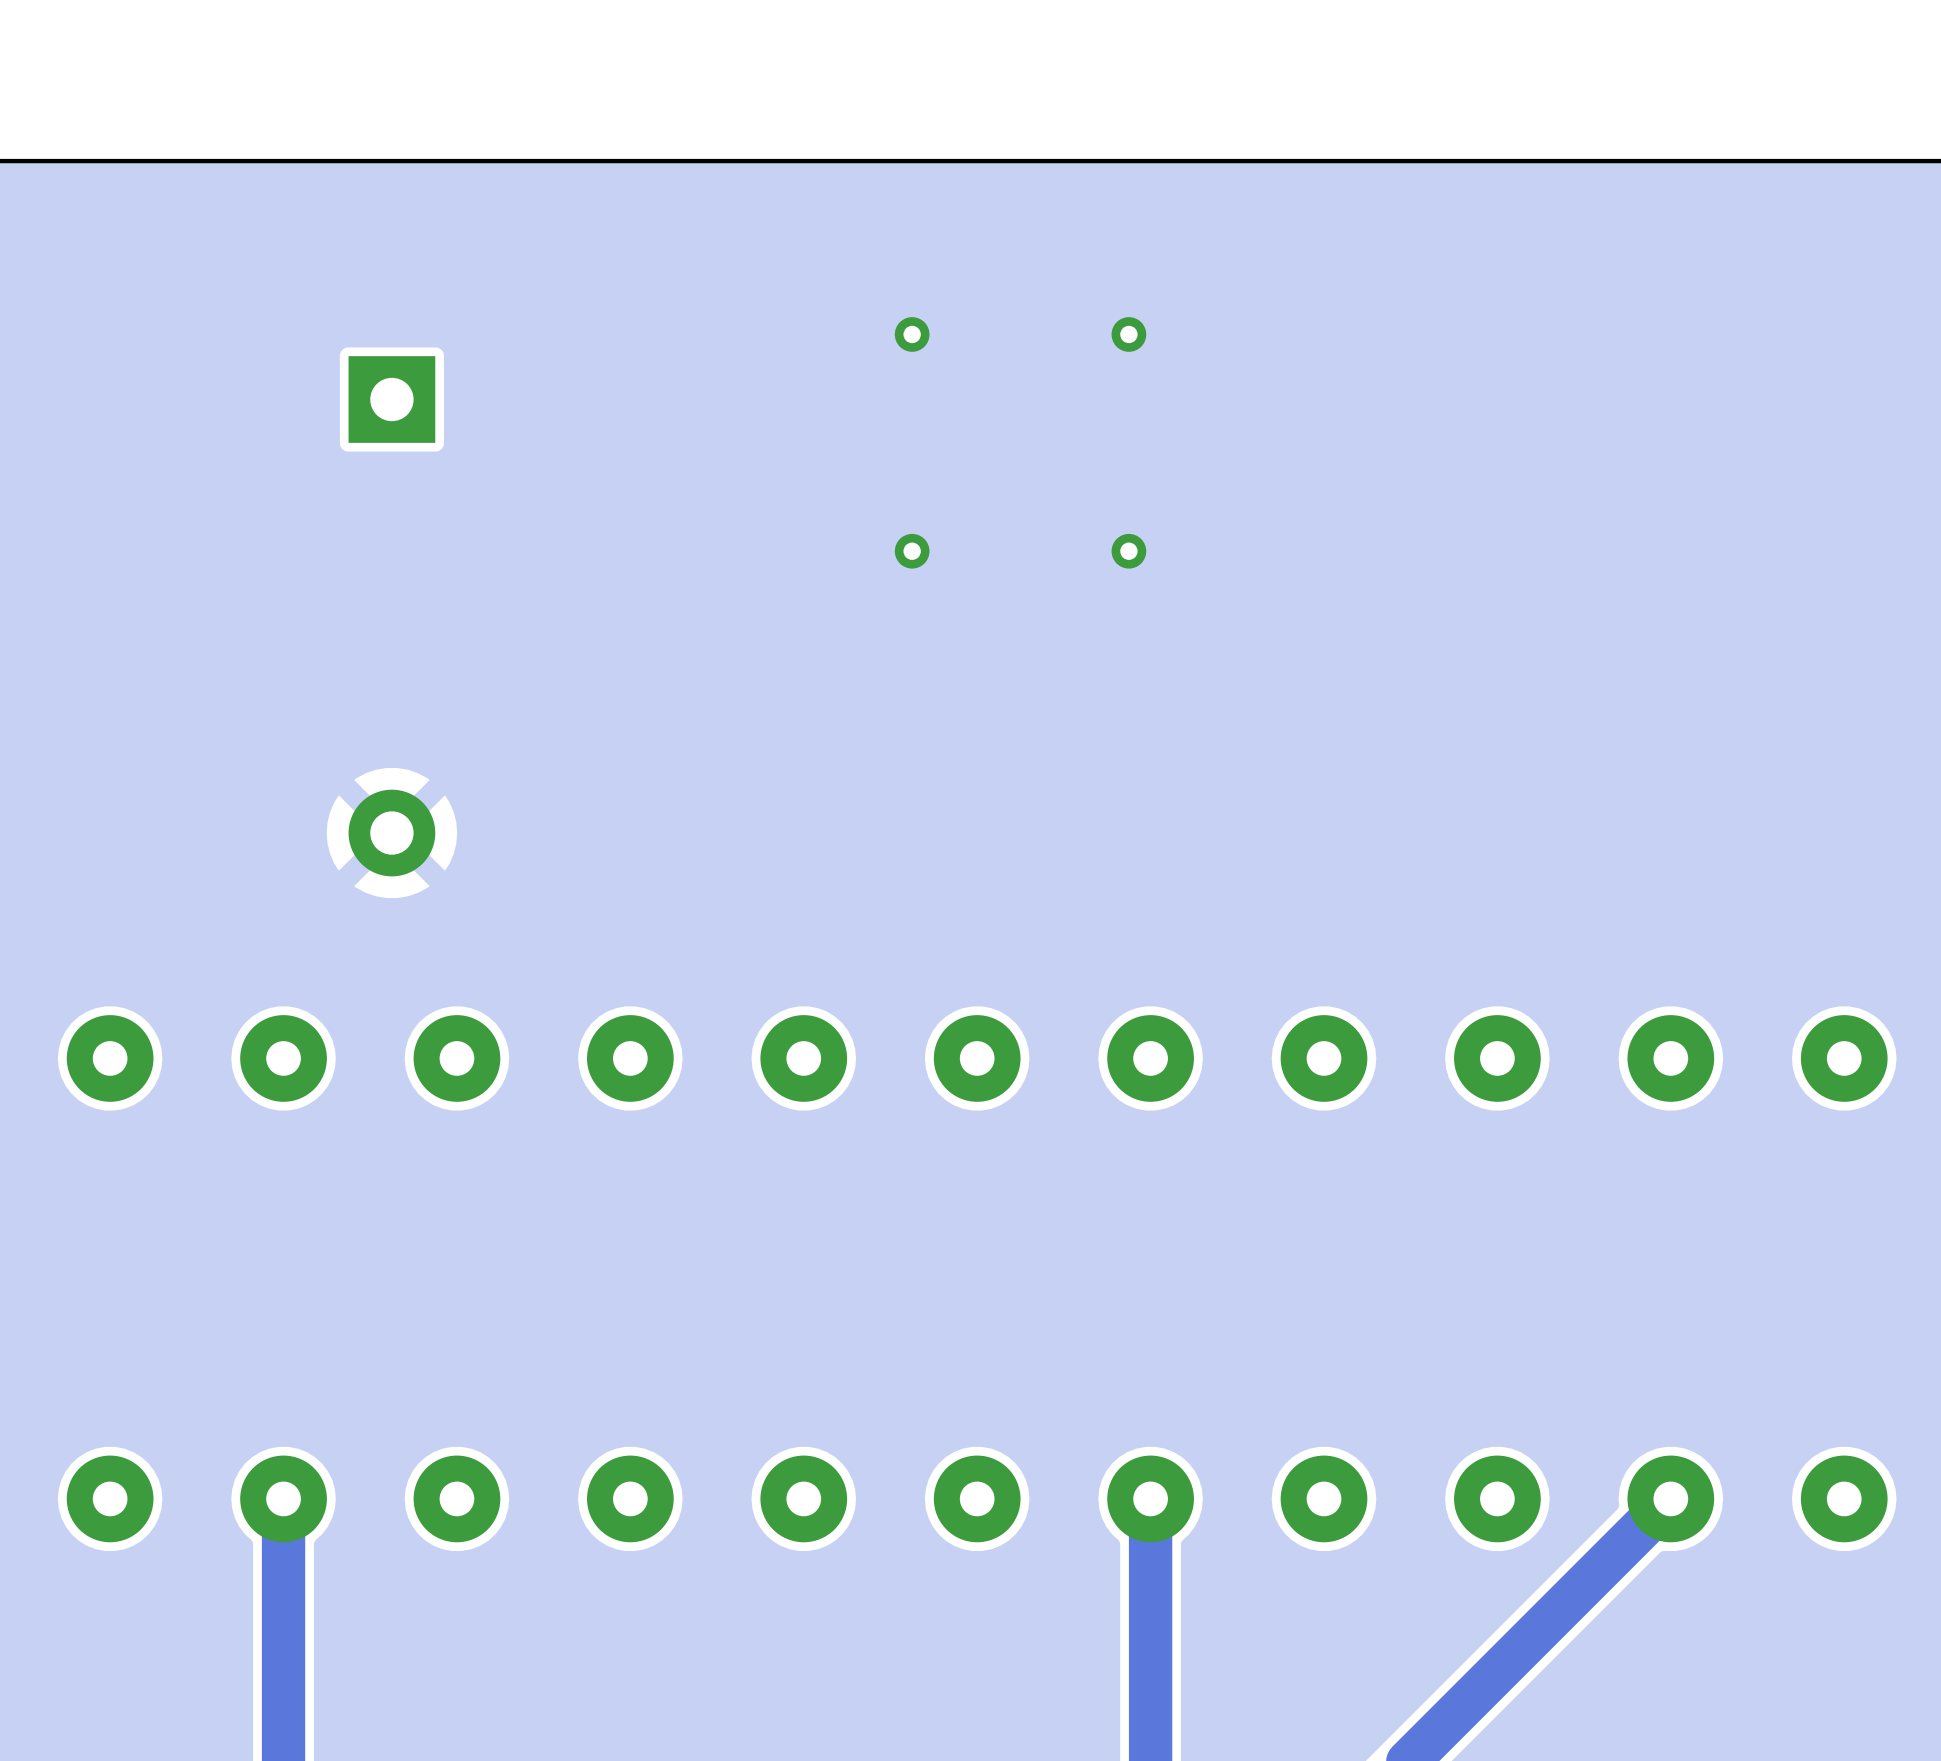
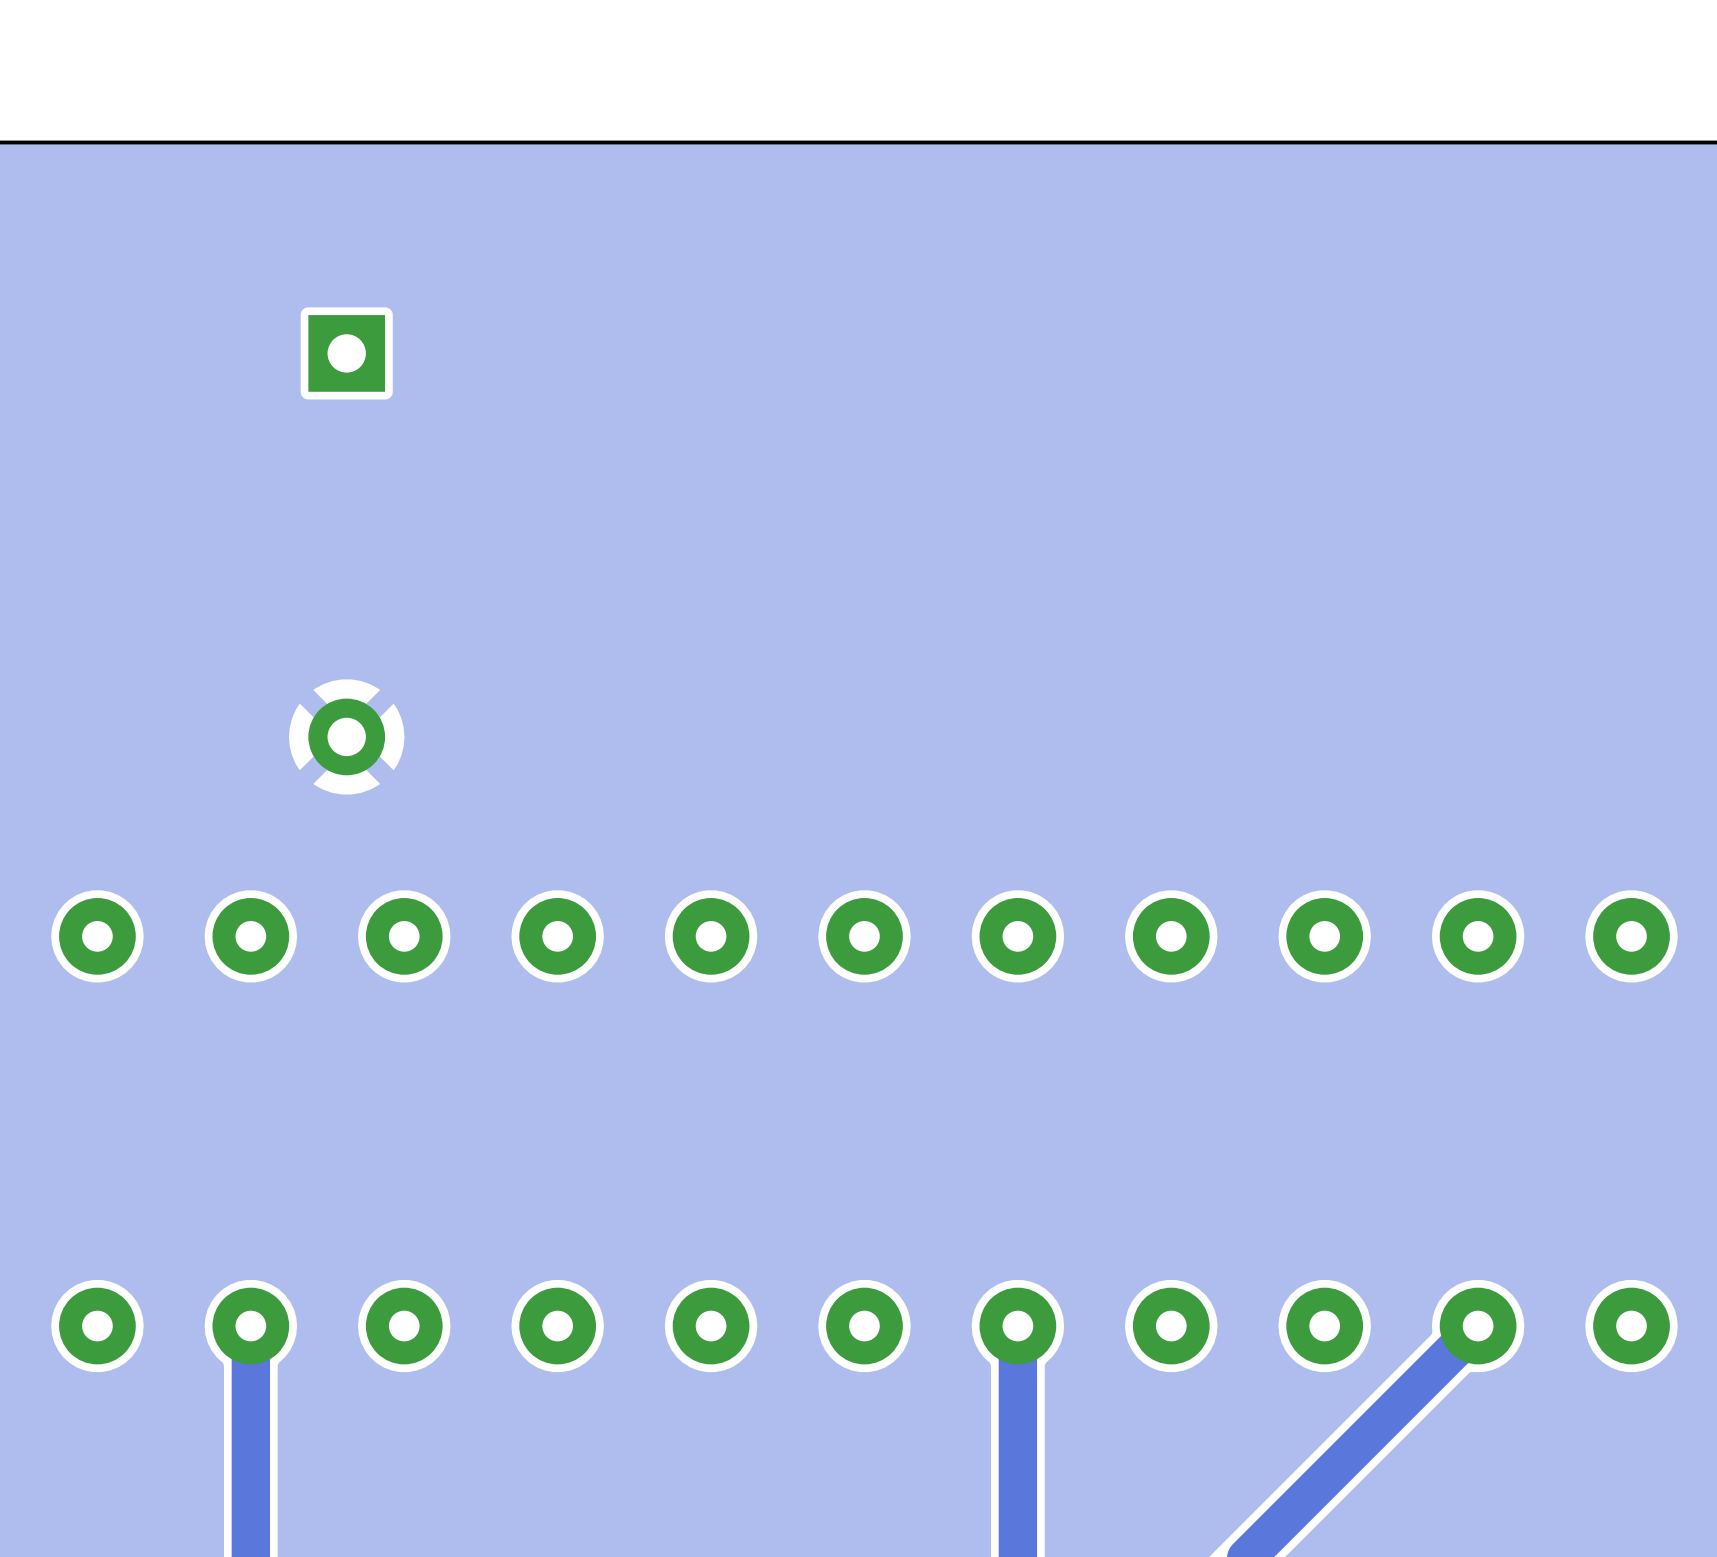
via: (912, 334) -> none
via: (1128, 334) -> none
via: (912, 551) -> none
via: (1128, 551) -> none

